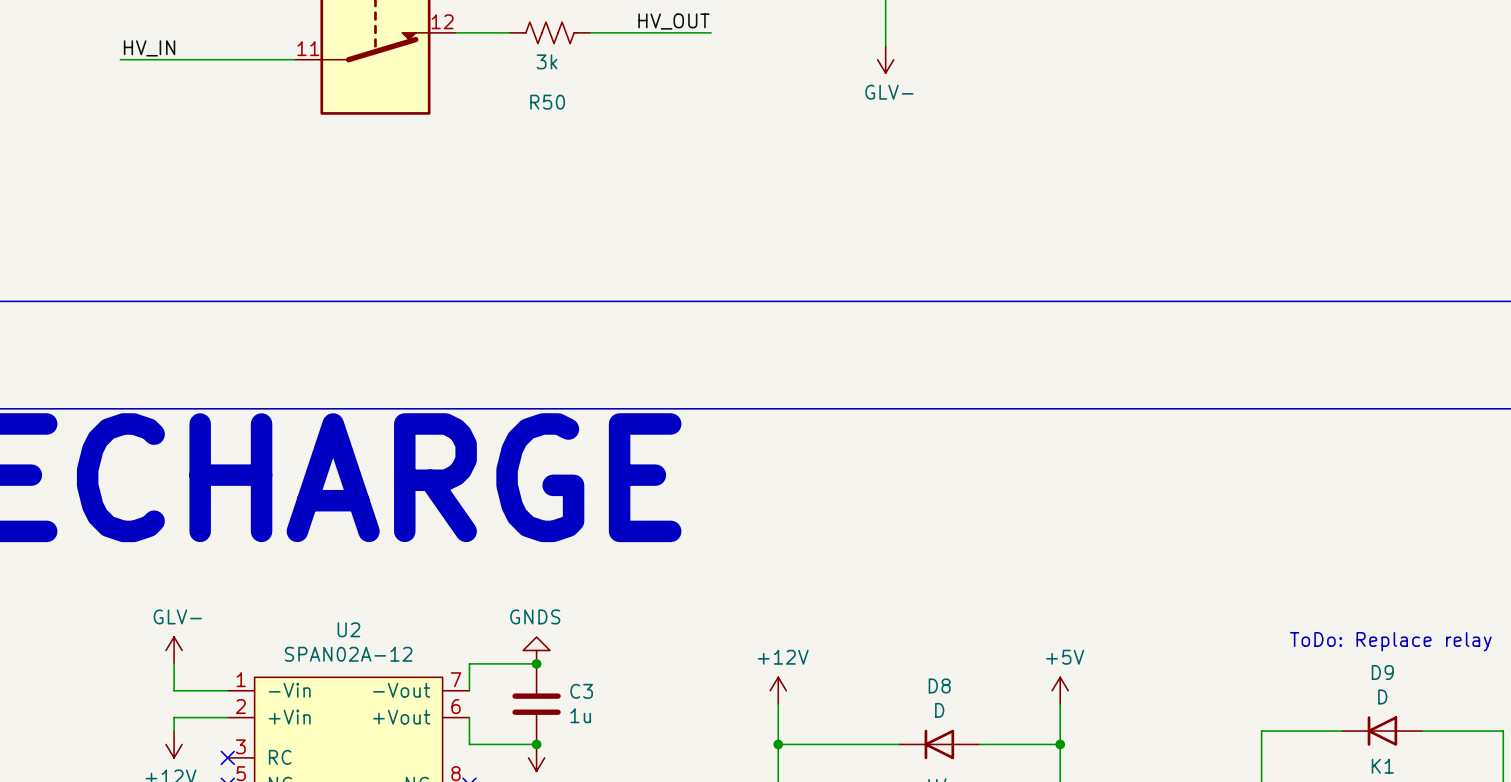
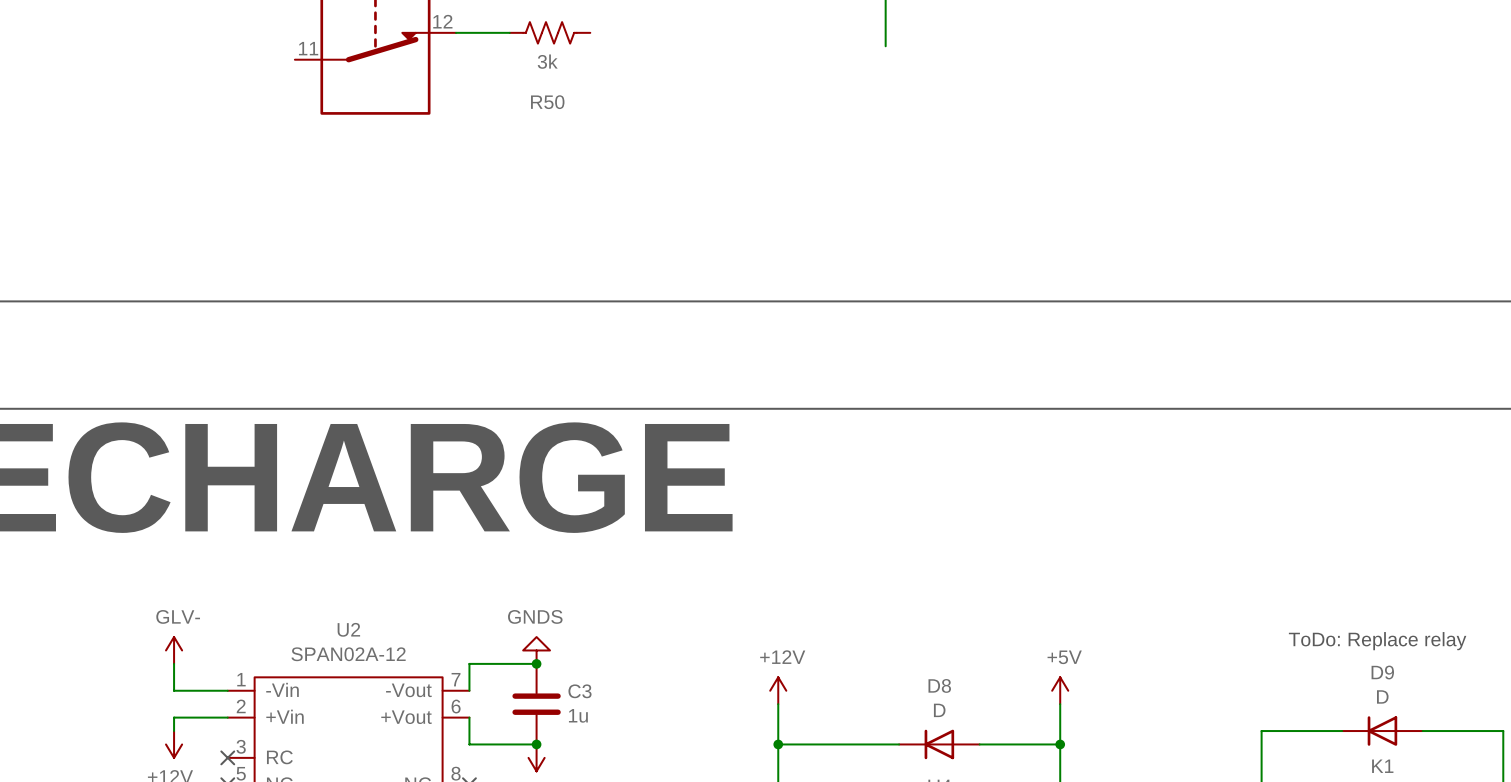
label: HV_OUT (673, 21) -> none
wire: (590, 32) (711, 32) -> none
label: HV_IN (149, 48) -> none
wire: (120, 59) (294, 59) -> none
power symbol: GLV- (885, 59) -> none

